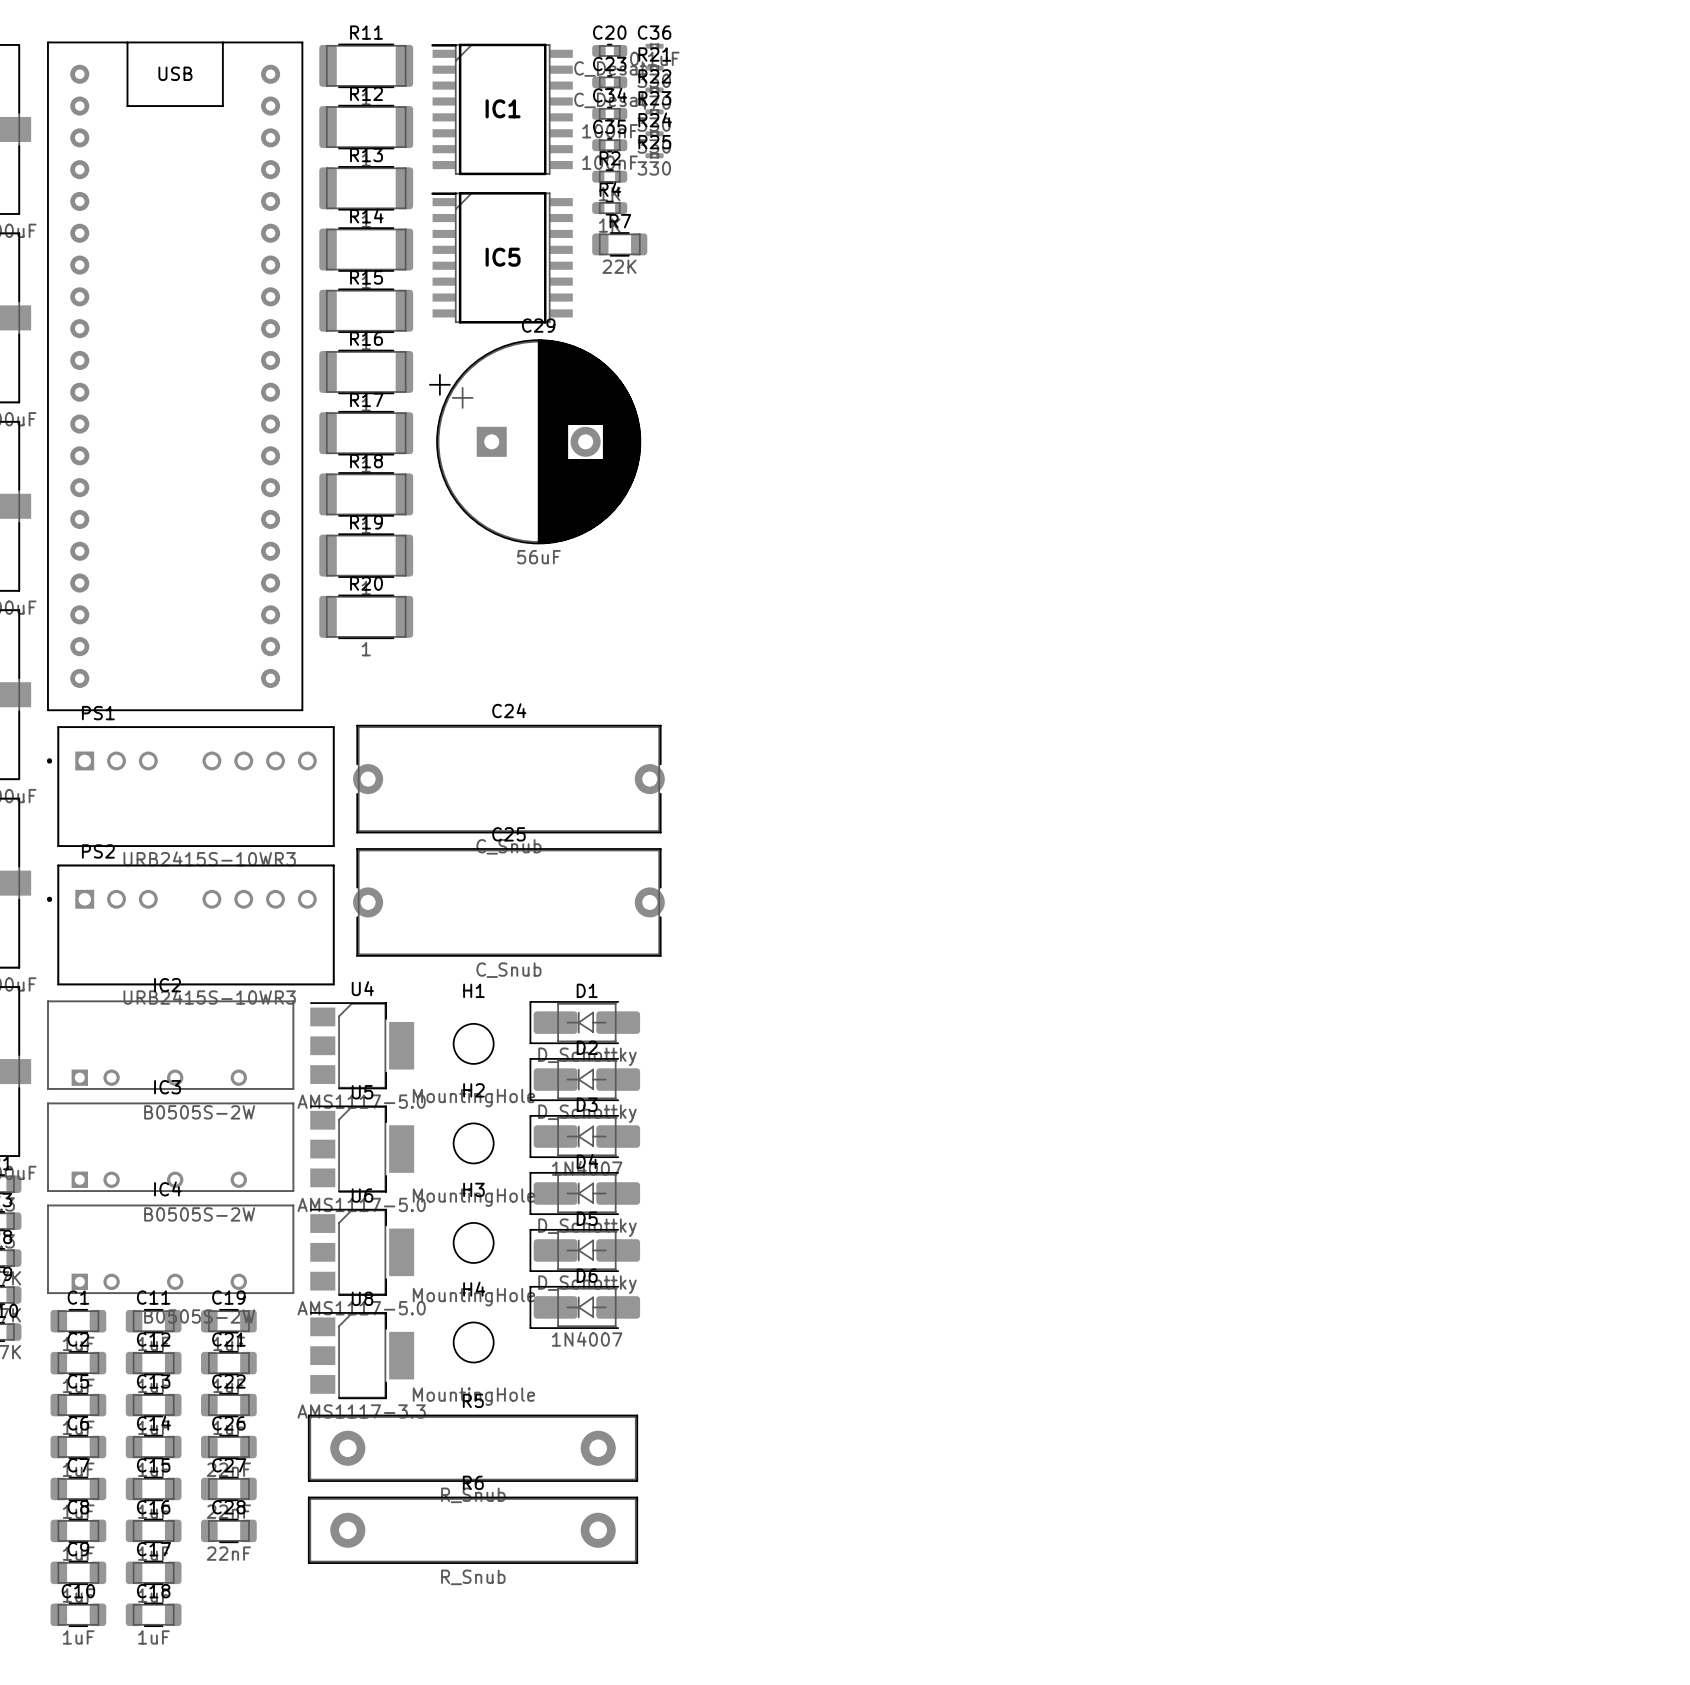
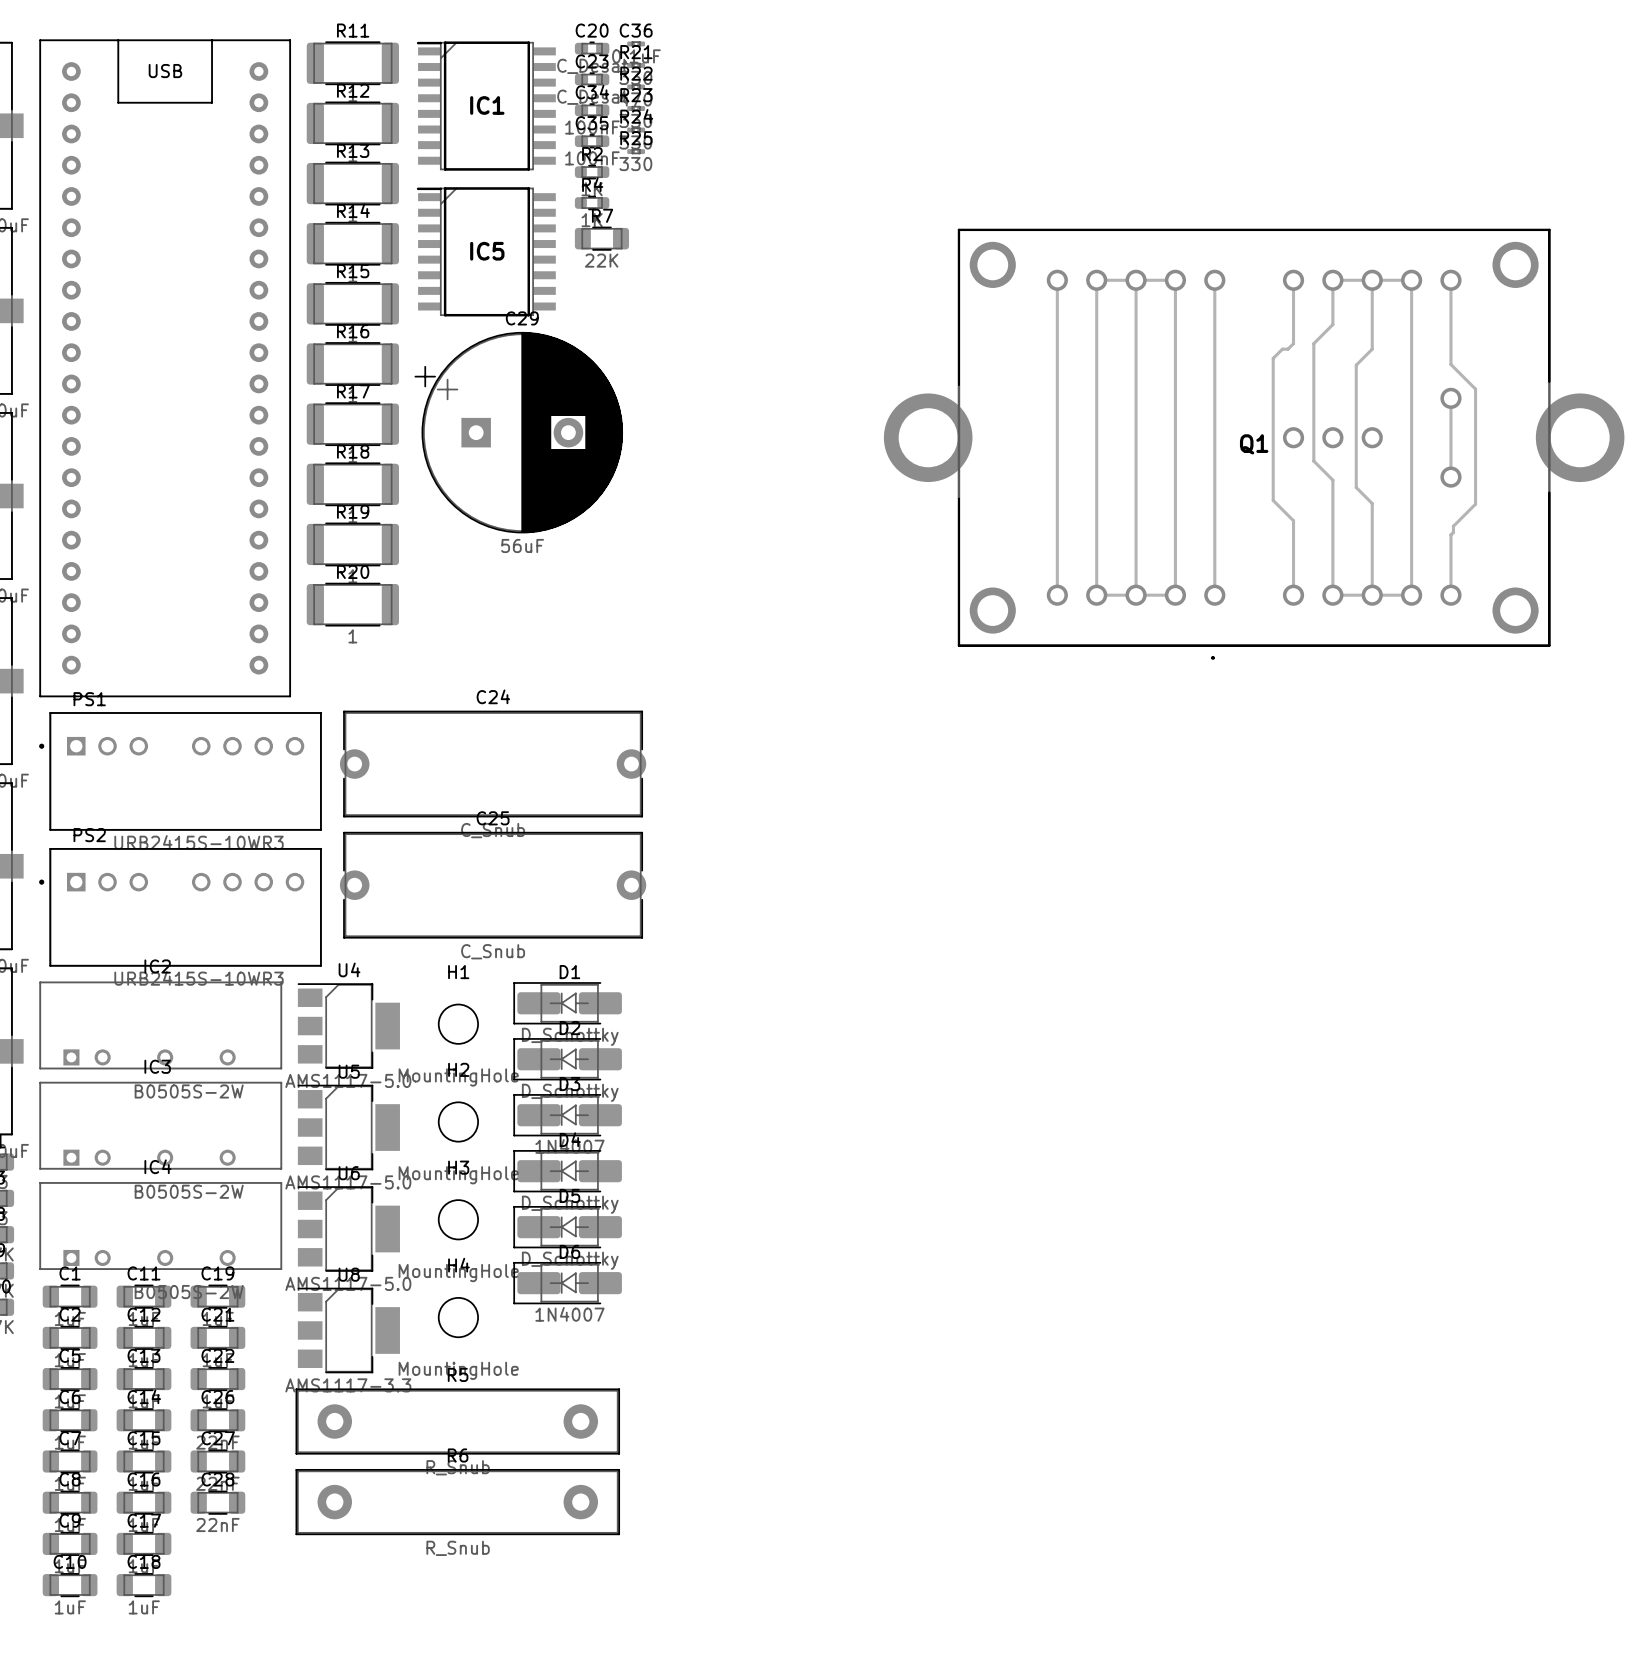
track: none -> (1057, 280) (1057, 595)
track: none -> (1096, 280) (1096, 595) (1175, 595) (1175, 280) (1096, 280)
track: none -> (1136, 280) (1136, 595)
track: none -> (1214, 280) (1214, 595)
track: none -> (1293, 280) (1293, 343) (1287, 349) (1282, 349) (1273, 358) (1273, 500) (1293, 520) (1293, 595)
track: none -> (1332, 280) (1411, 280) (1411, 595) (1332, 595) (1332, 480) (1313, 461) (1313, 343) (1332, 324) (1332, 280)
track: none -> (1372, 280) (1372, 349) (1356, 365) (1356, 487) (1372, 503) (1372, 595)
track: none -> (1450, 280) (1450, 364) (1475, 389) (1475, 504) (1453, 526) (1453, 532) (1450, 534) (1450, 595)
track: none -> (1450, 398) (1450, 477)
Q1: none -> (1254, 444)

